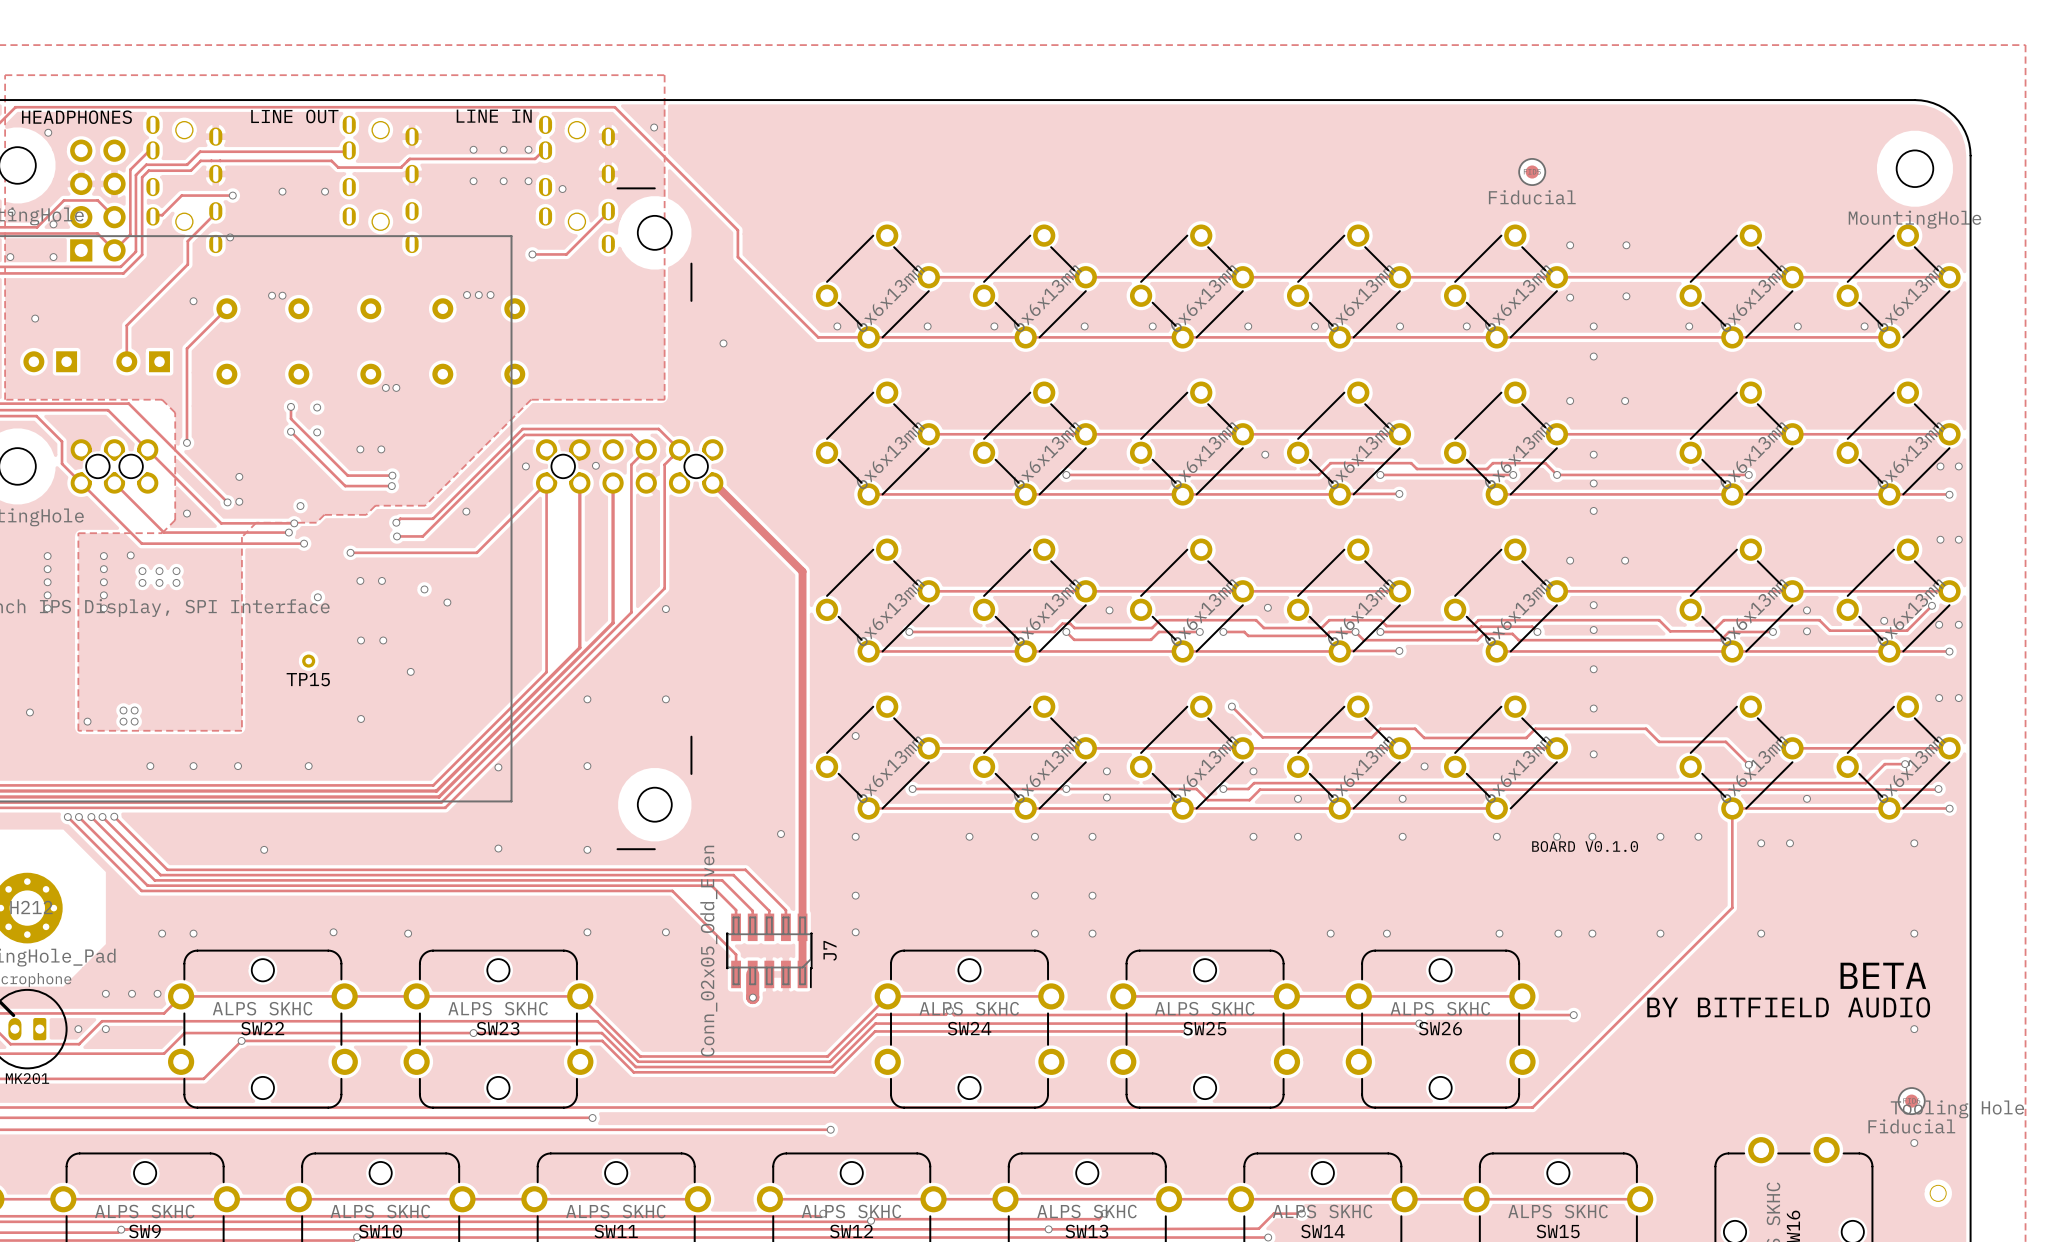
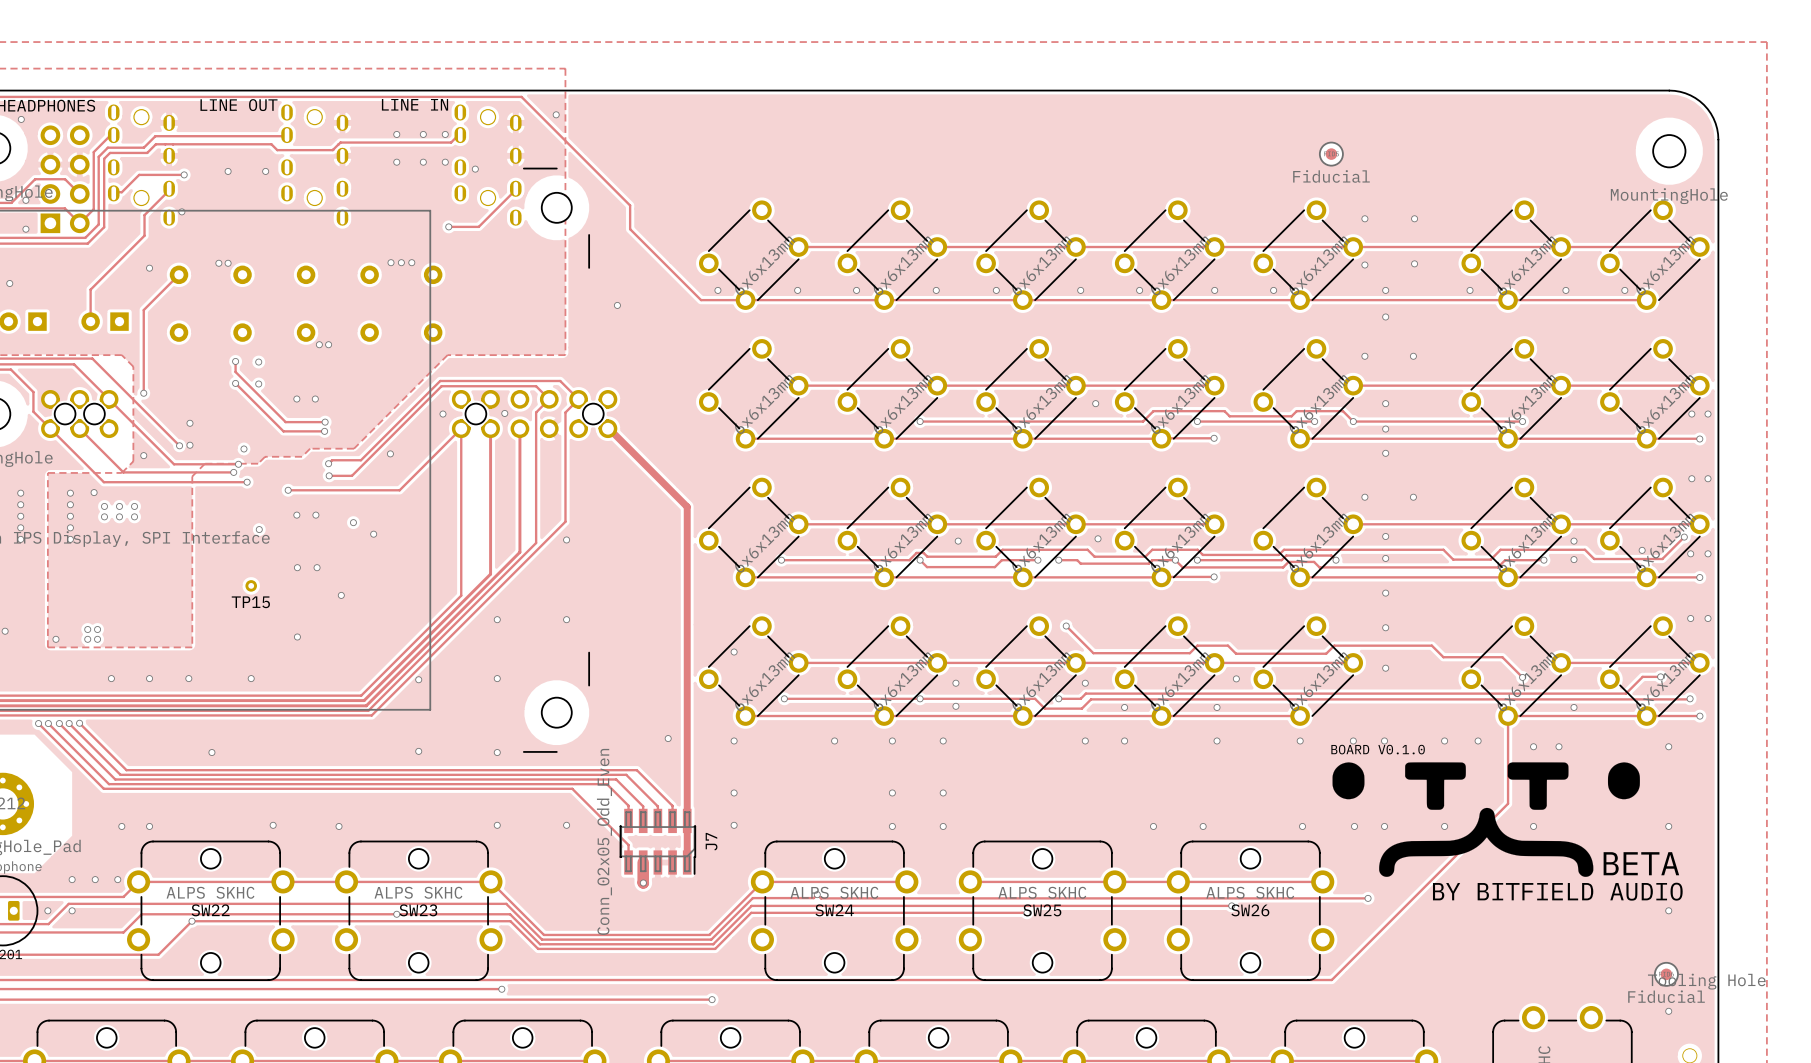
drawing: none -> [1332, 762, 1640, 877]

